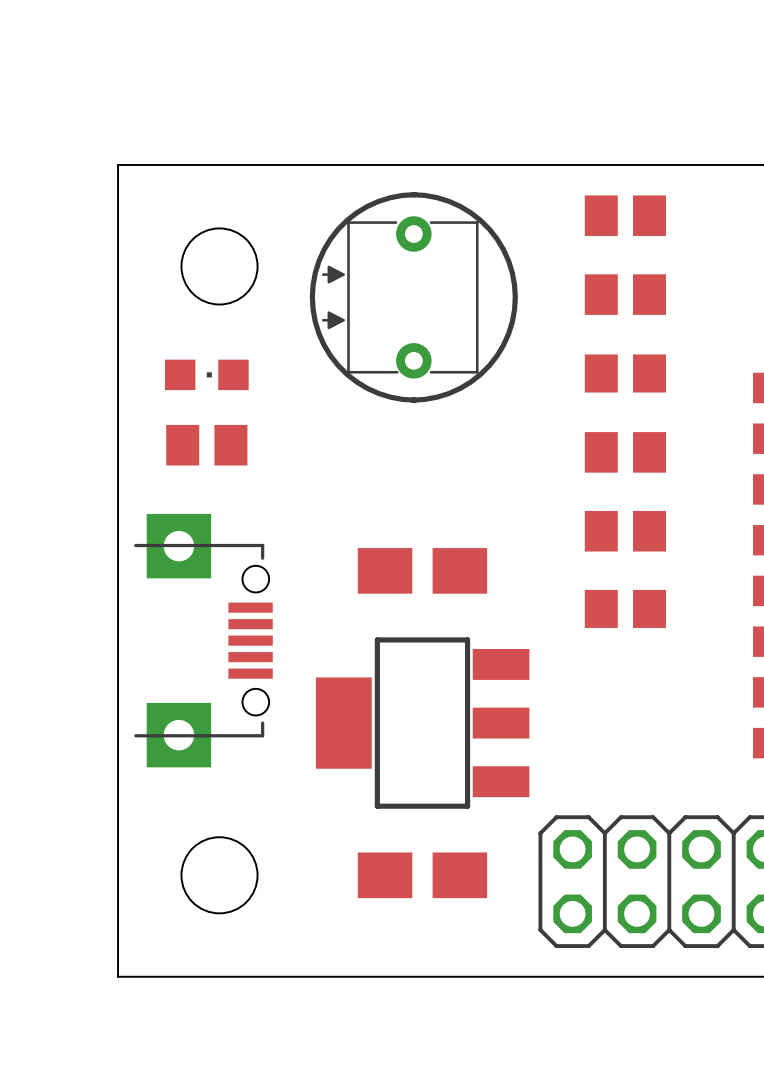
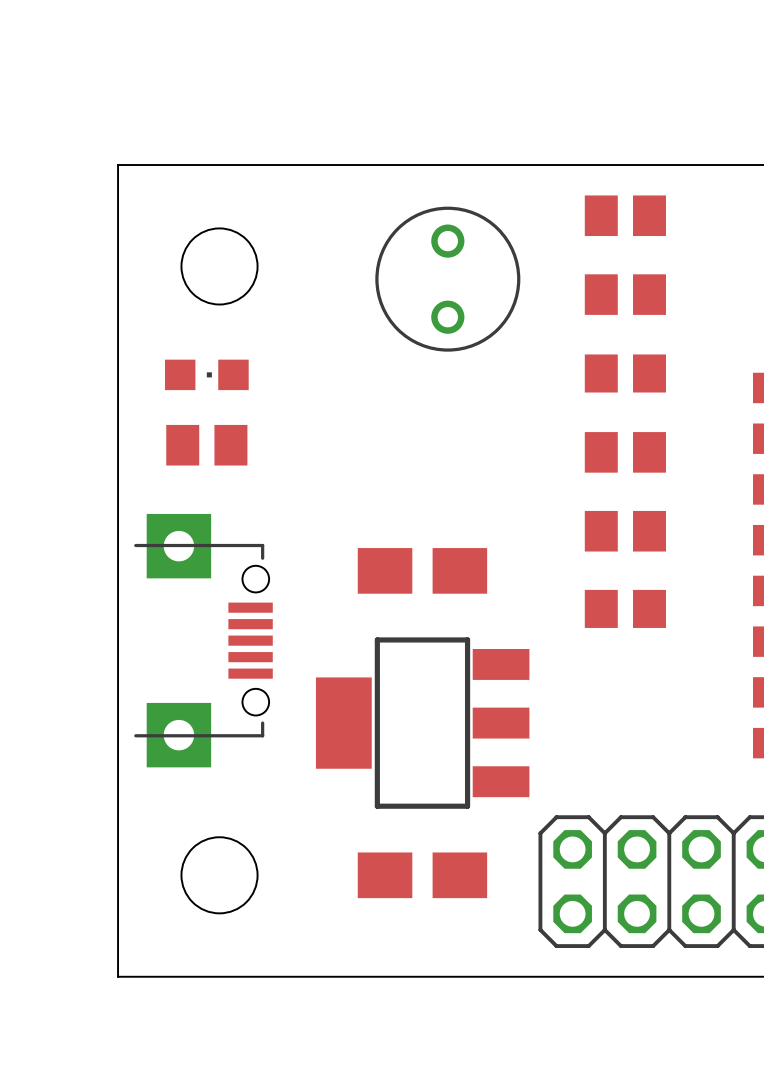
part: none -> (447, 279)
part: (413, 297) -> none

